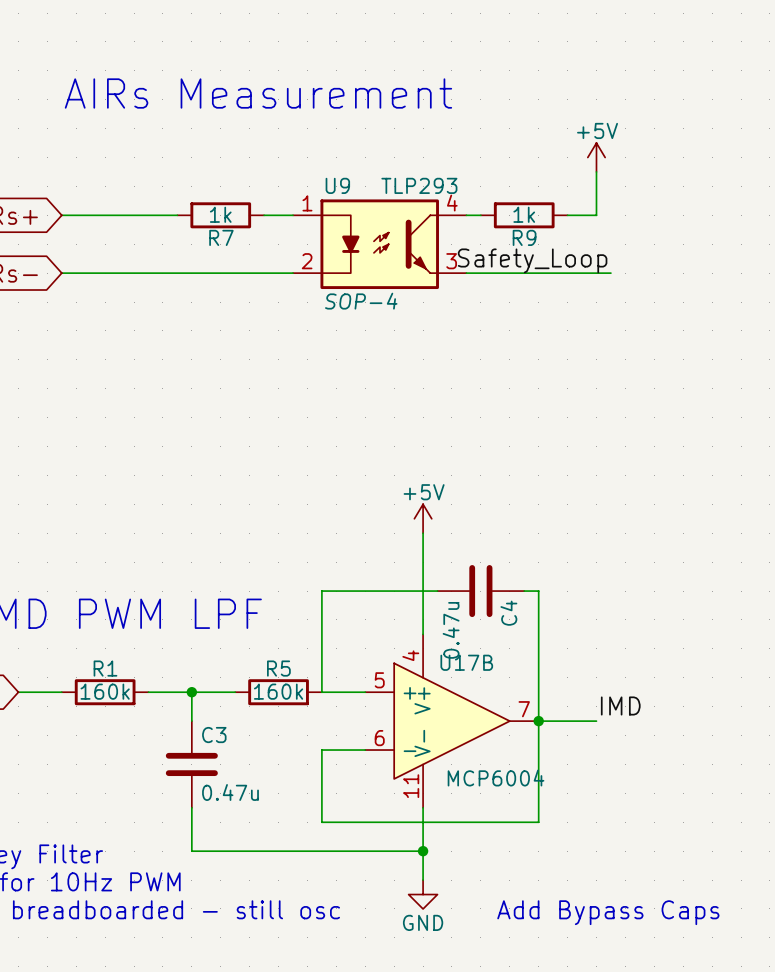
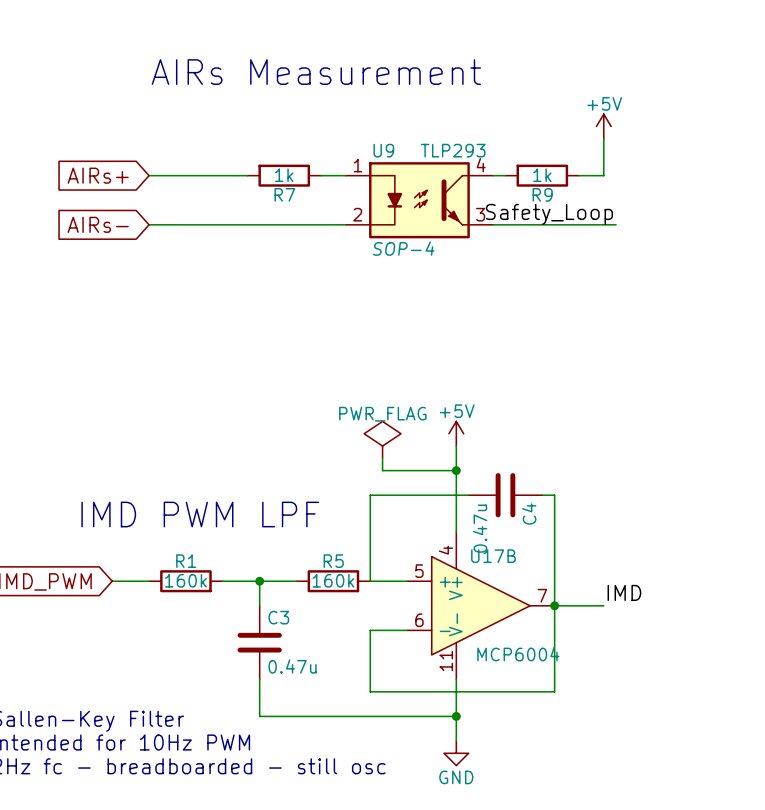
power symbol: none -> PWR_FLAG (382, 439)
wire: none -> (382, 458) (382, 470) (456, 470)
junction: none -> (456, 470)
text: Add Bypass Caps (608, 912) -> none

